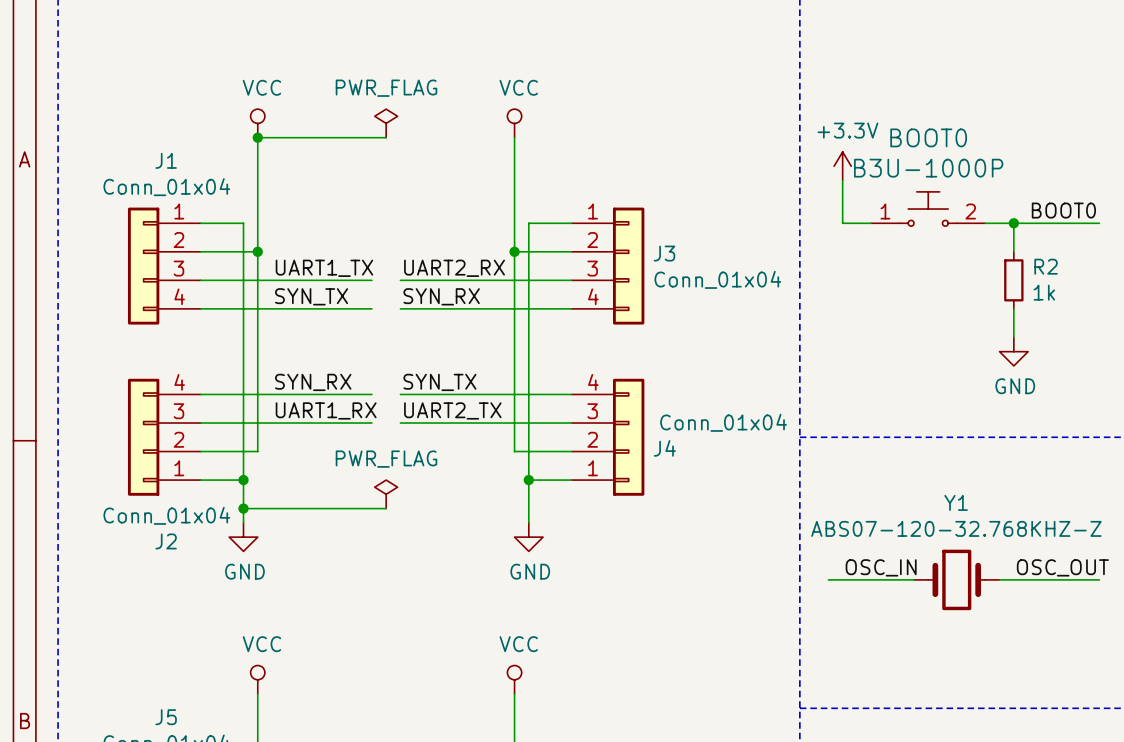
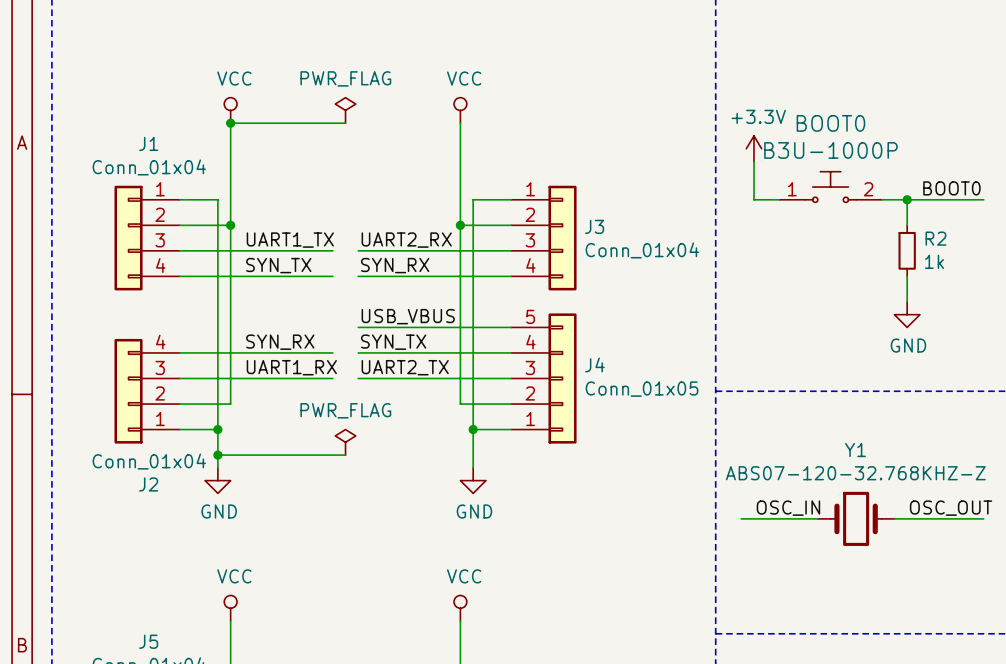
label: none -> USB_VBUS (408, 316)
wire: none -> (358, 327) (511, 327)
J4 symbol: [571, 378, 645, 496] -> [511, 313, 577, 444]
J4 value: Conn_01x04 (723, 422) -> Conn_01x05 (642, 389)
J4 name position: J4 (664, 448) -> J4 (594, 364)

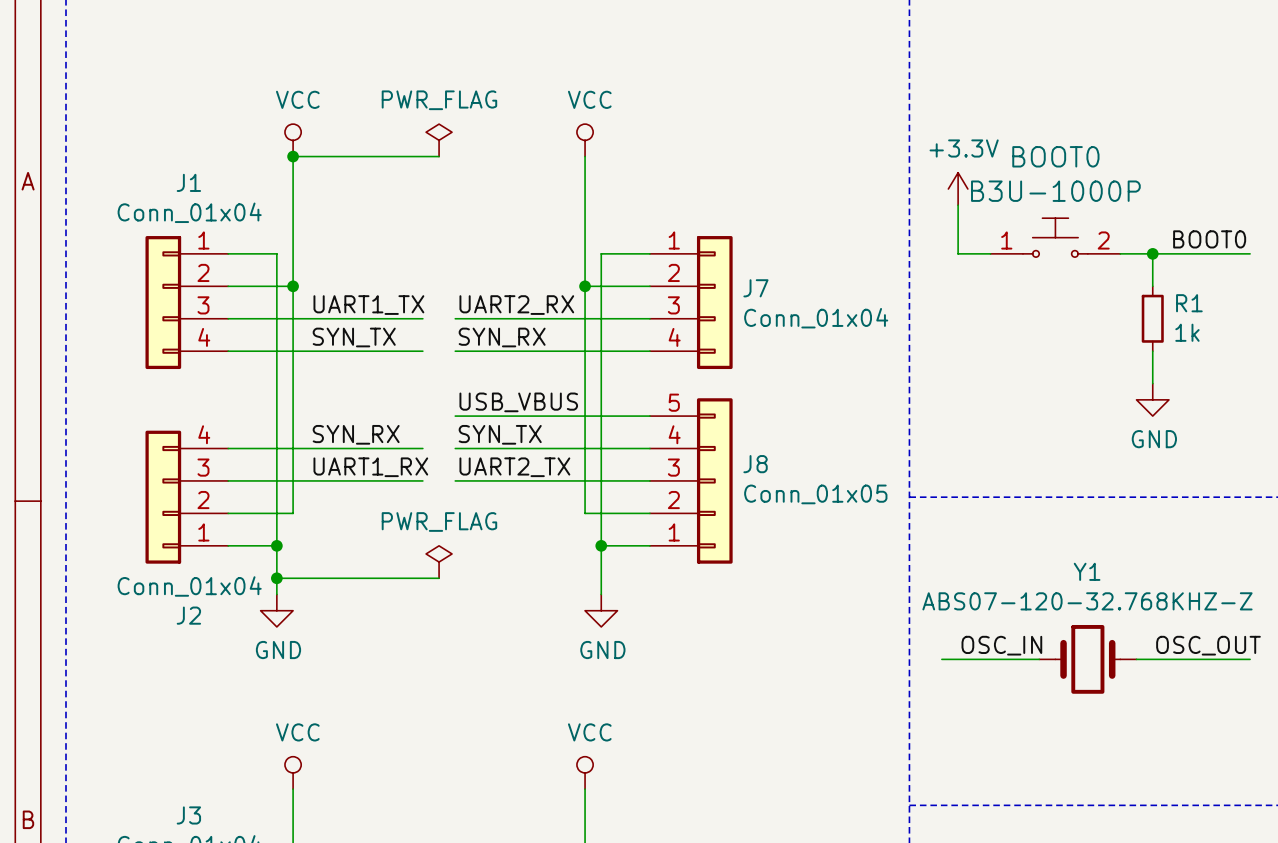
J3 name: J3 (594, 226) -> J7 (755, 288)
R2 name: R2 (936, 238) -> R1 (1189, 303)
J4 name: J4 (594, 364) -> J8 (755, 464)
J5 name: J5 (148, 641) -> J3 (188, 815)

